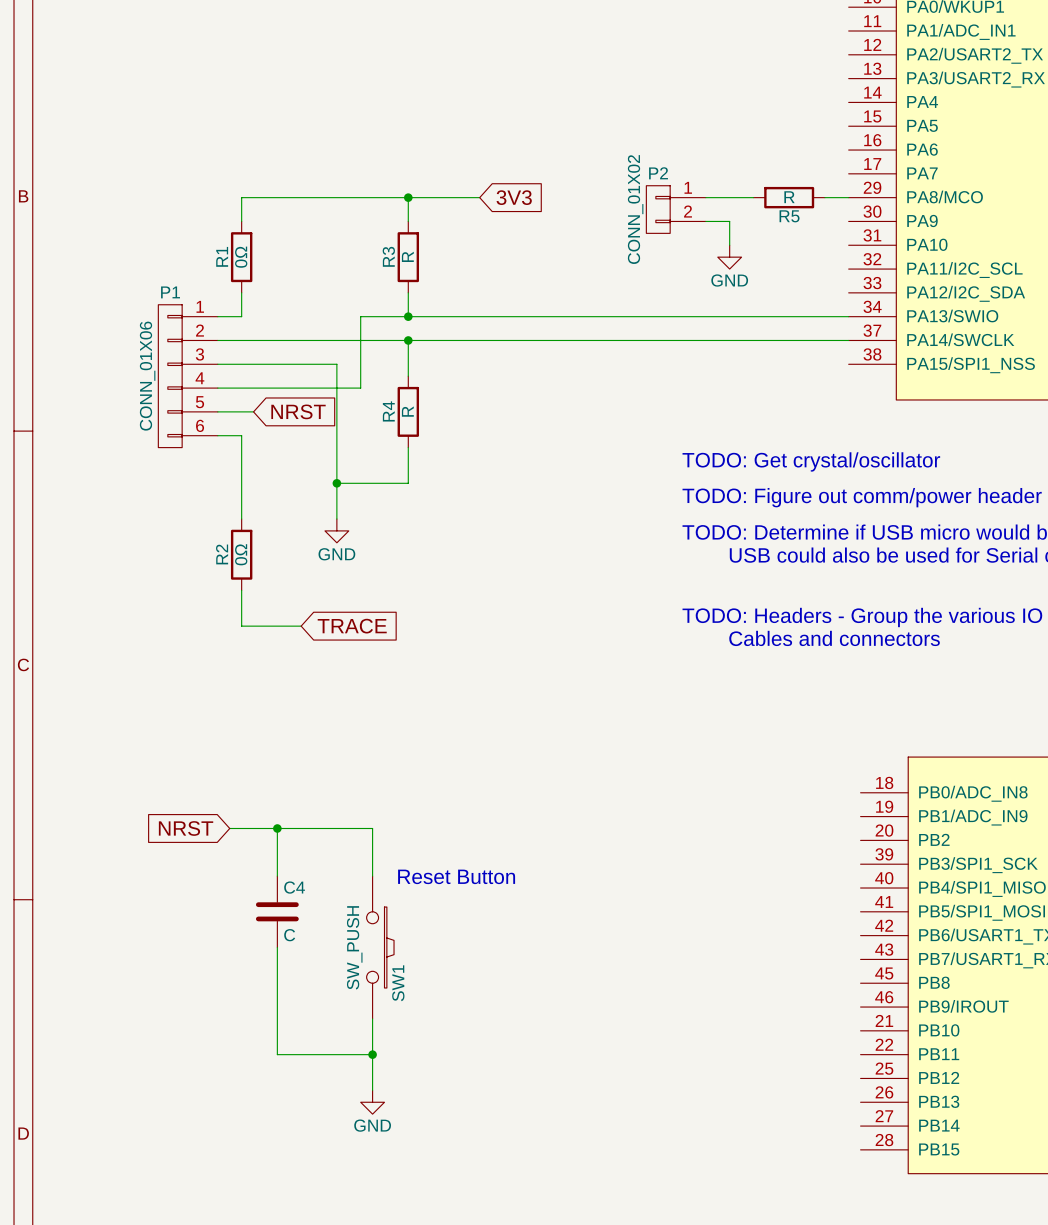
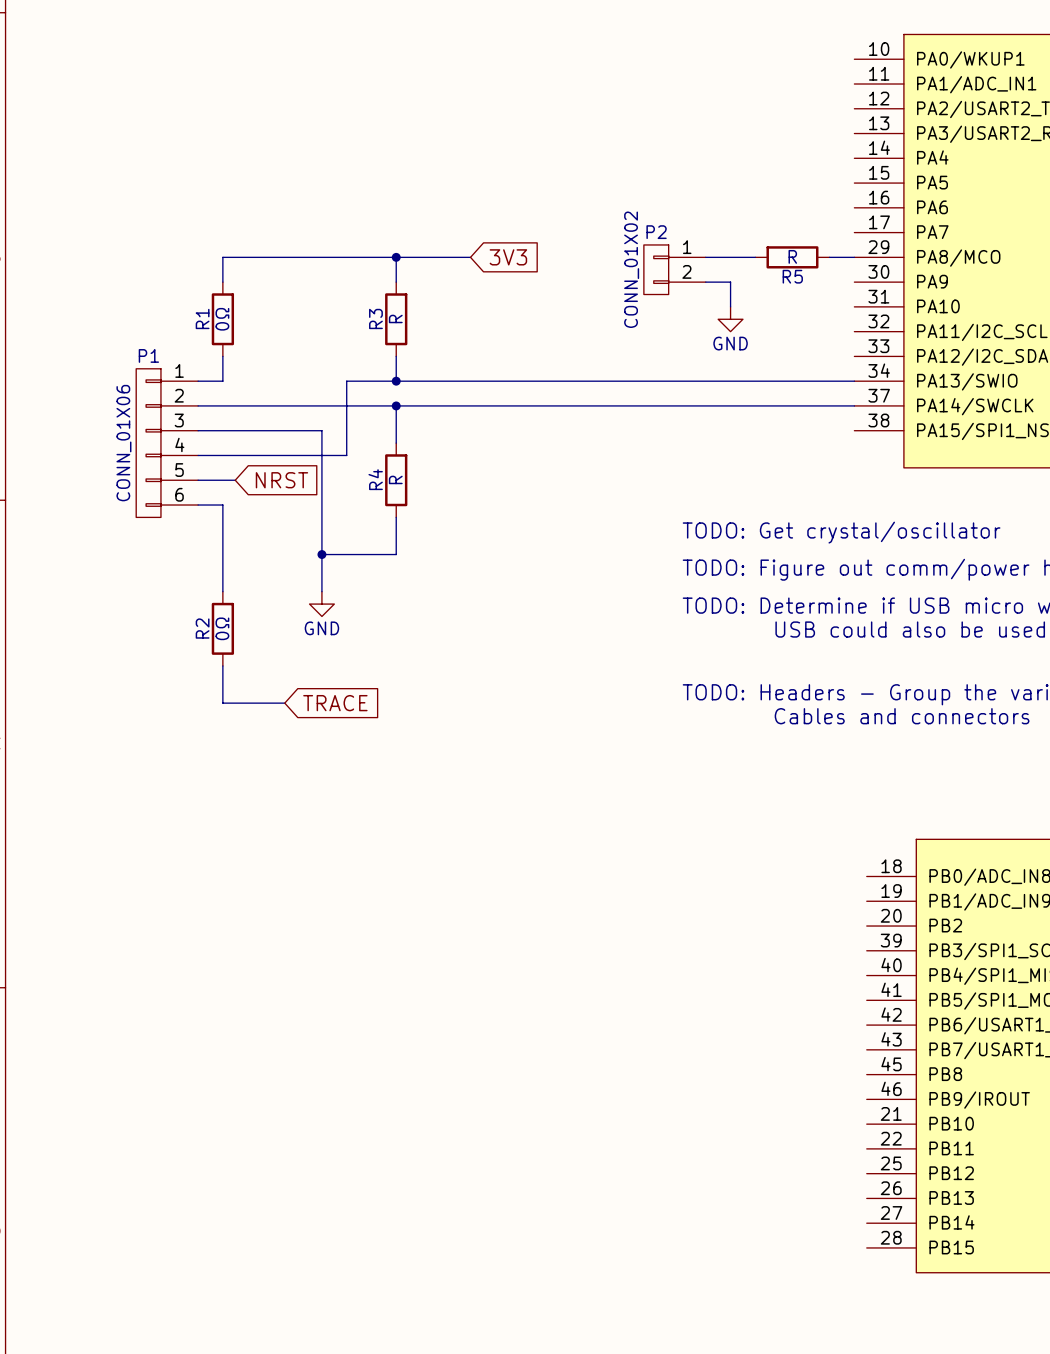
global label: NRST (186, 828) -> none
wire: (229, 828) (372, 828) (372, 876) -> none
wire: (277, 828) (277, 876) -> none
junction: (277, 828) -> none
text: Reset Button (456, 876) -> none
C4: C (277, 911) -> none
wire: (277, 947) (277, 1054) (372, 1054) -> none
SW1: SW_PUSH (380, 947) -> none
wire: (372, 1018) (372, 1090) -> none
junction: (372, 1054) -> none
power symbol: GND (372, 1102) -> none

